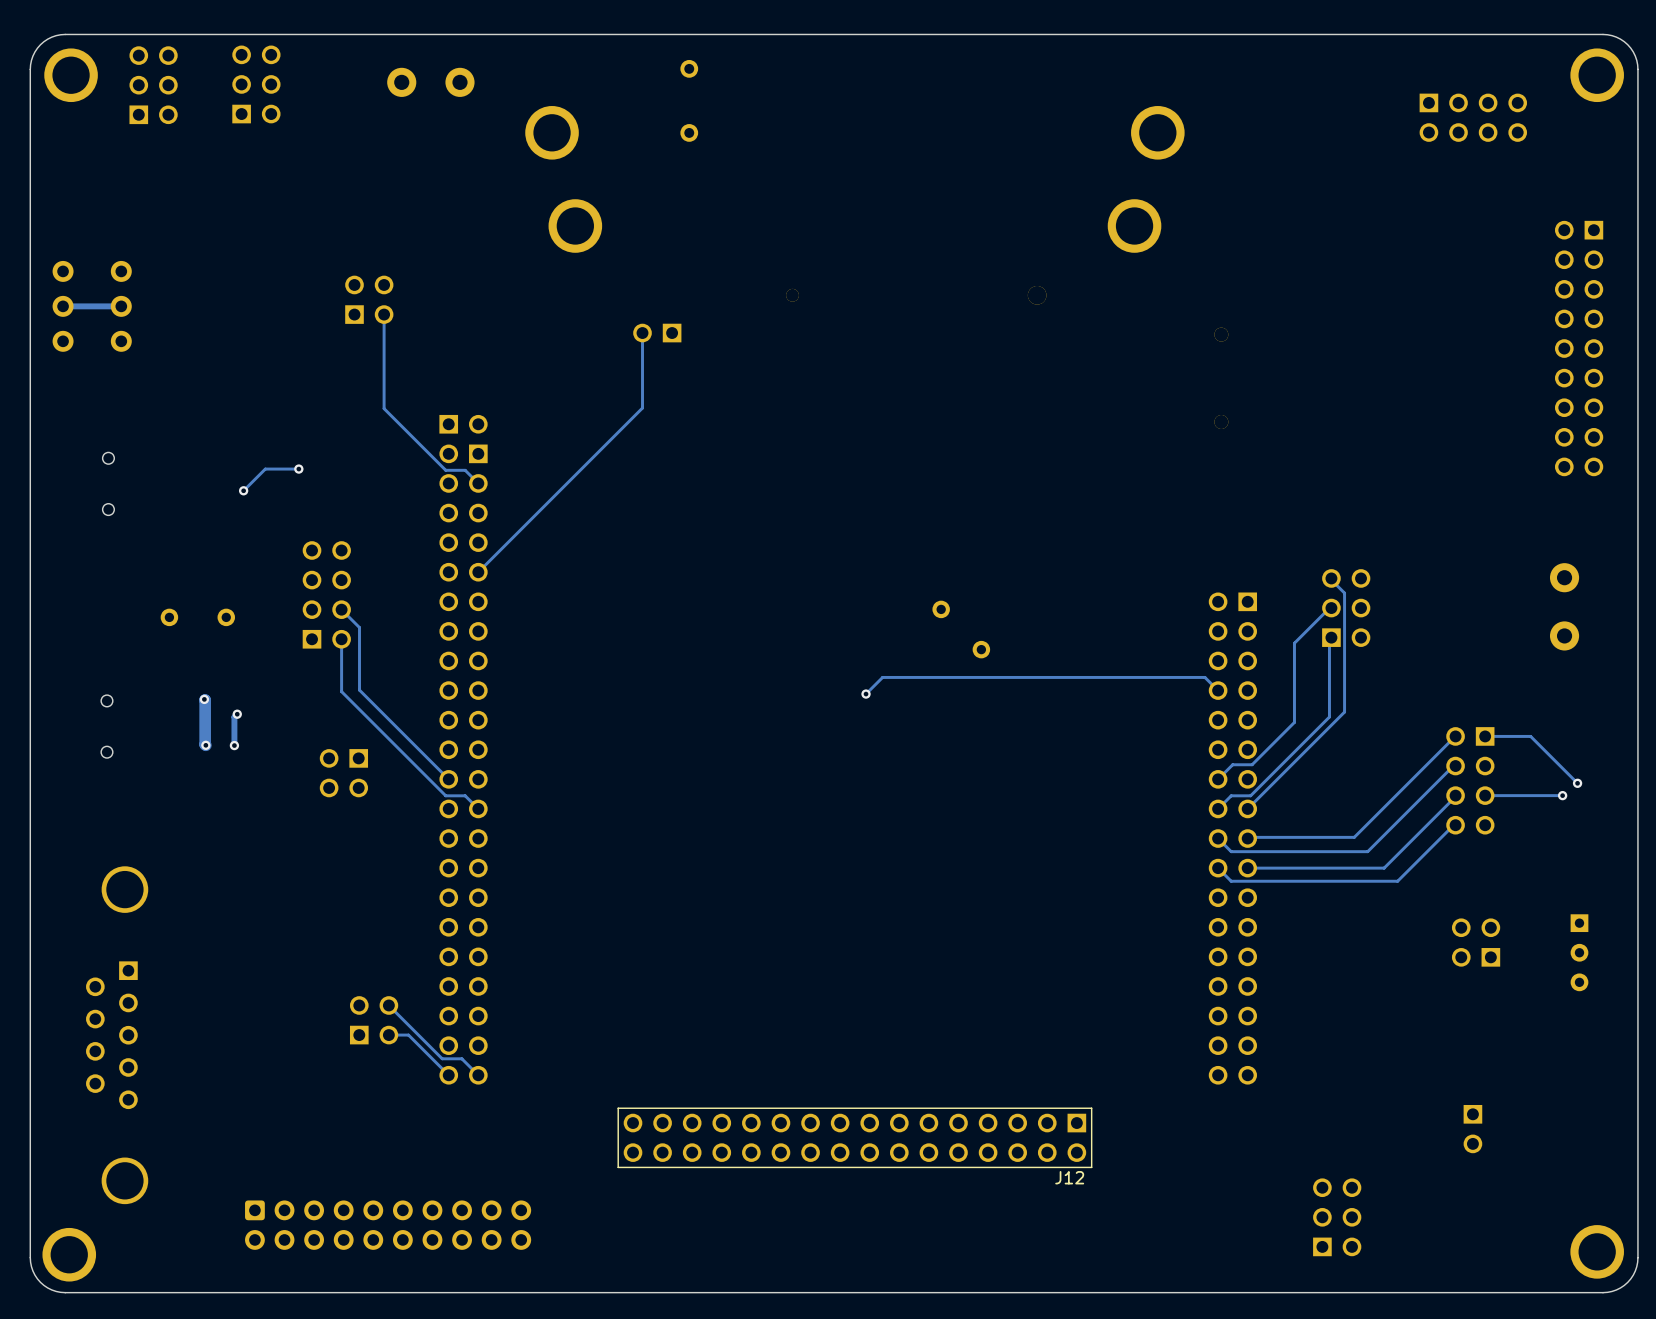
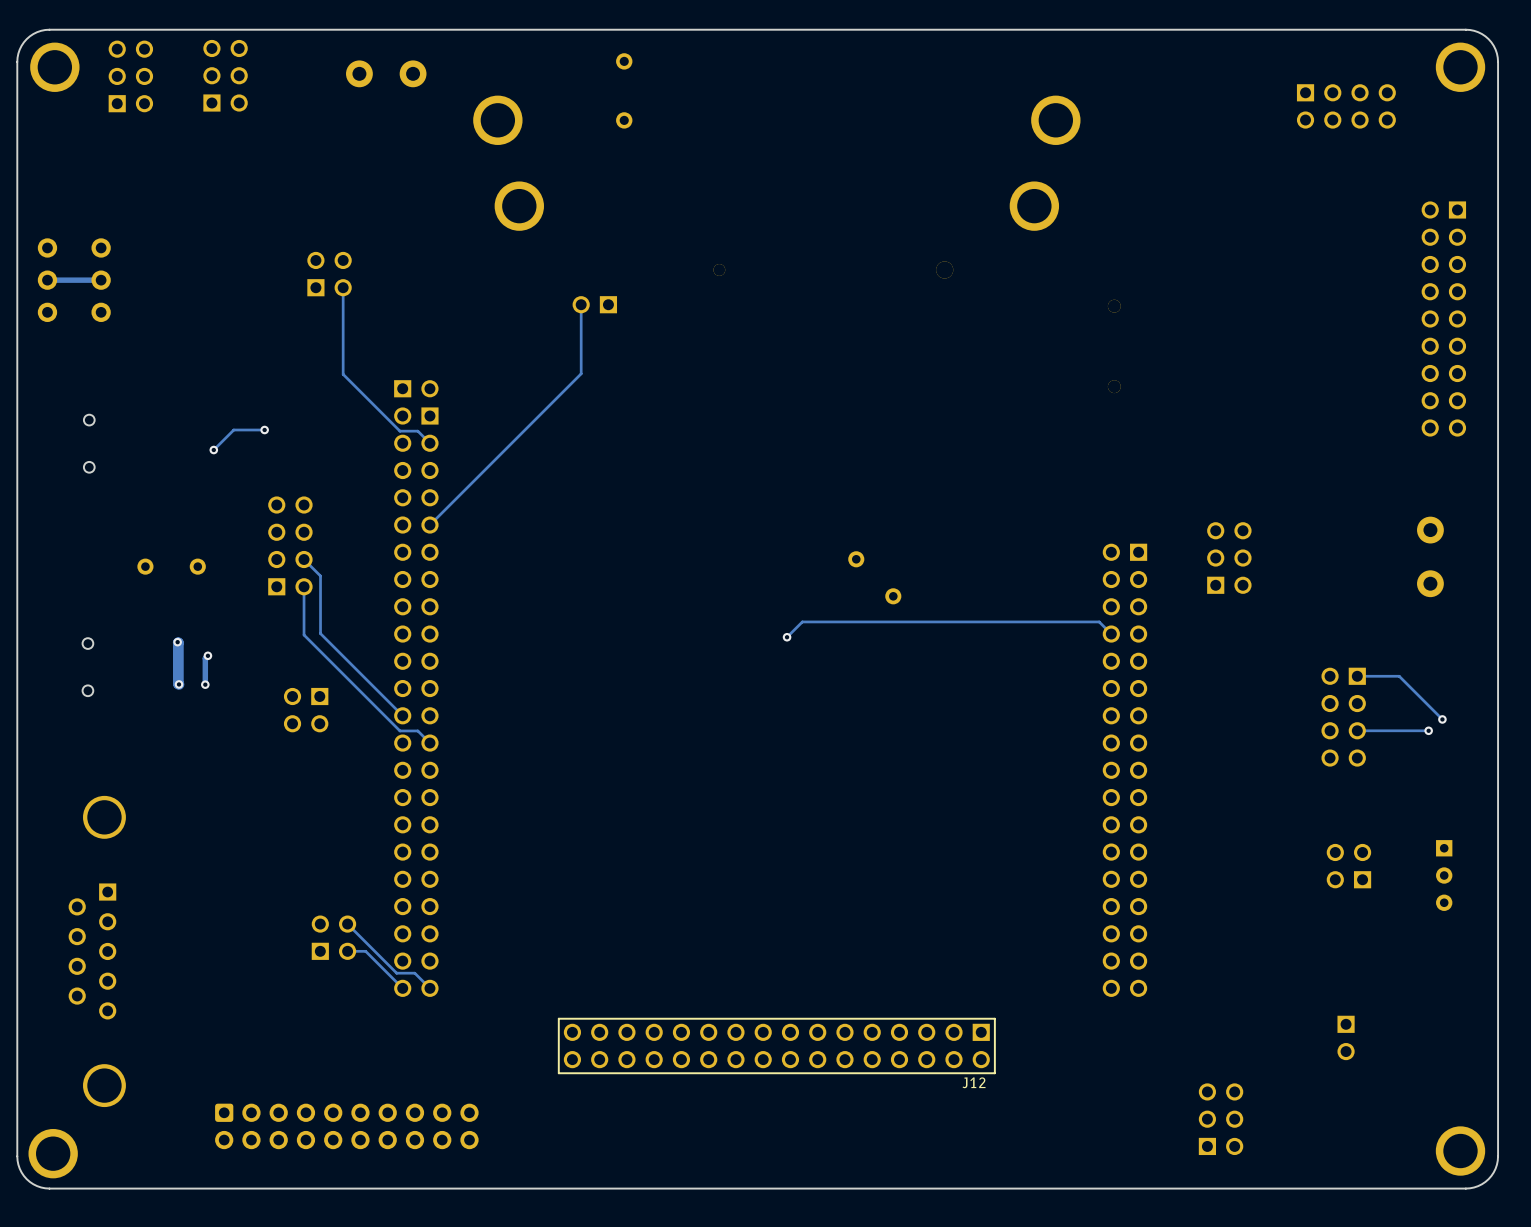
track: (1331, 578) (1344, 593) (1344, 712) (1247, 808) -> none
track: (1331, 608) (1331, 606) (1294, 643) (1294, 722) (1252, 764) (1232, 764) (1218, 779) -> none
track: (1331, 637) (1329, 637) (1329, 716) (1250, 795) (1231, 795) (1218, 808) -> none
track: (1455, 736) (1354, 837) (1247, 838) -> none
track: (1455, 766) (1453, 766) (1367, 851) (1231, 851) (1218, 838) -> none
track: (1455, 795) (1384, 868) (1247, 868) -> none
track: (1455, 825) (1397, 881) (1231, 881) (1218, 868) -> none

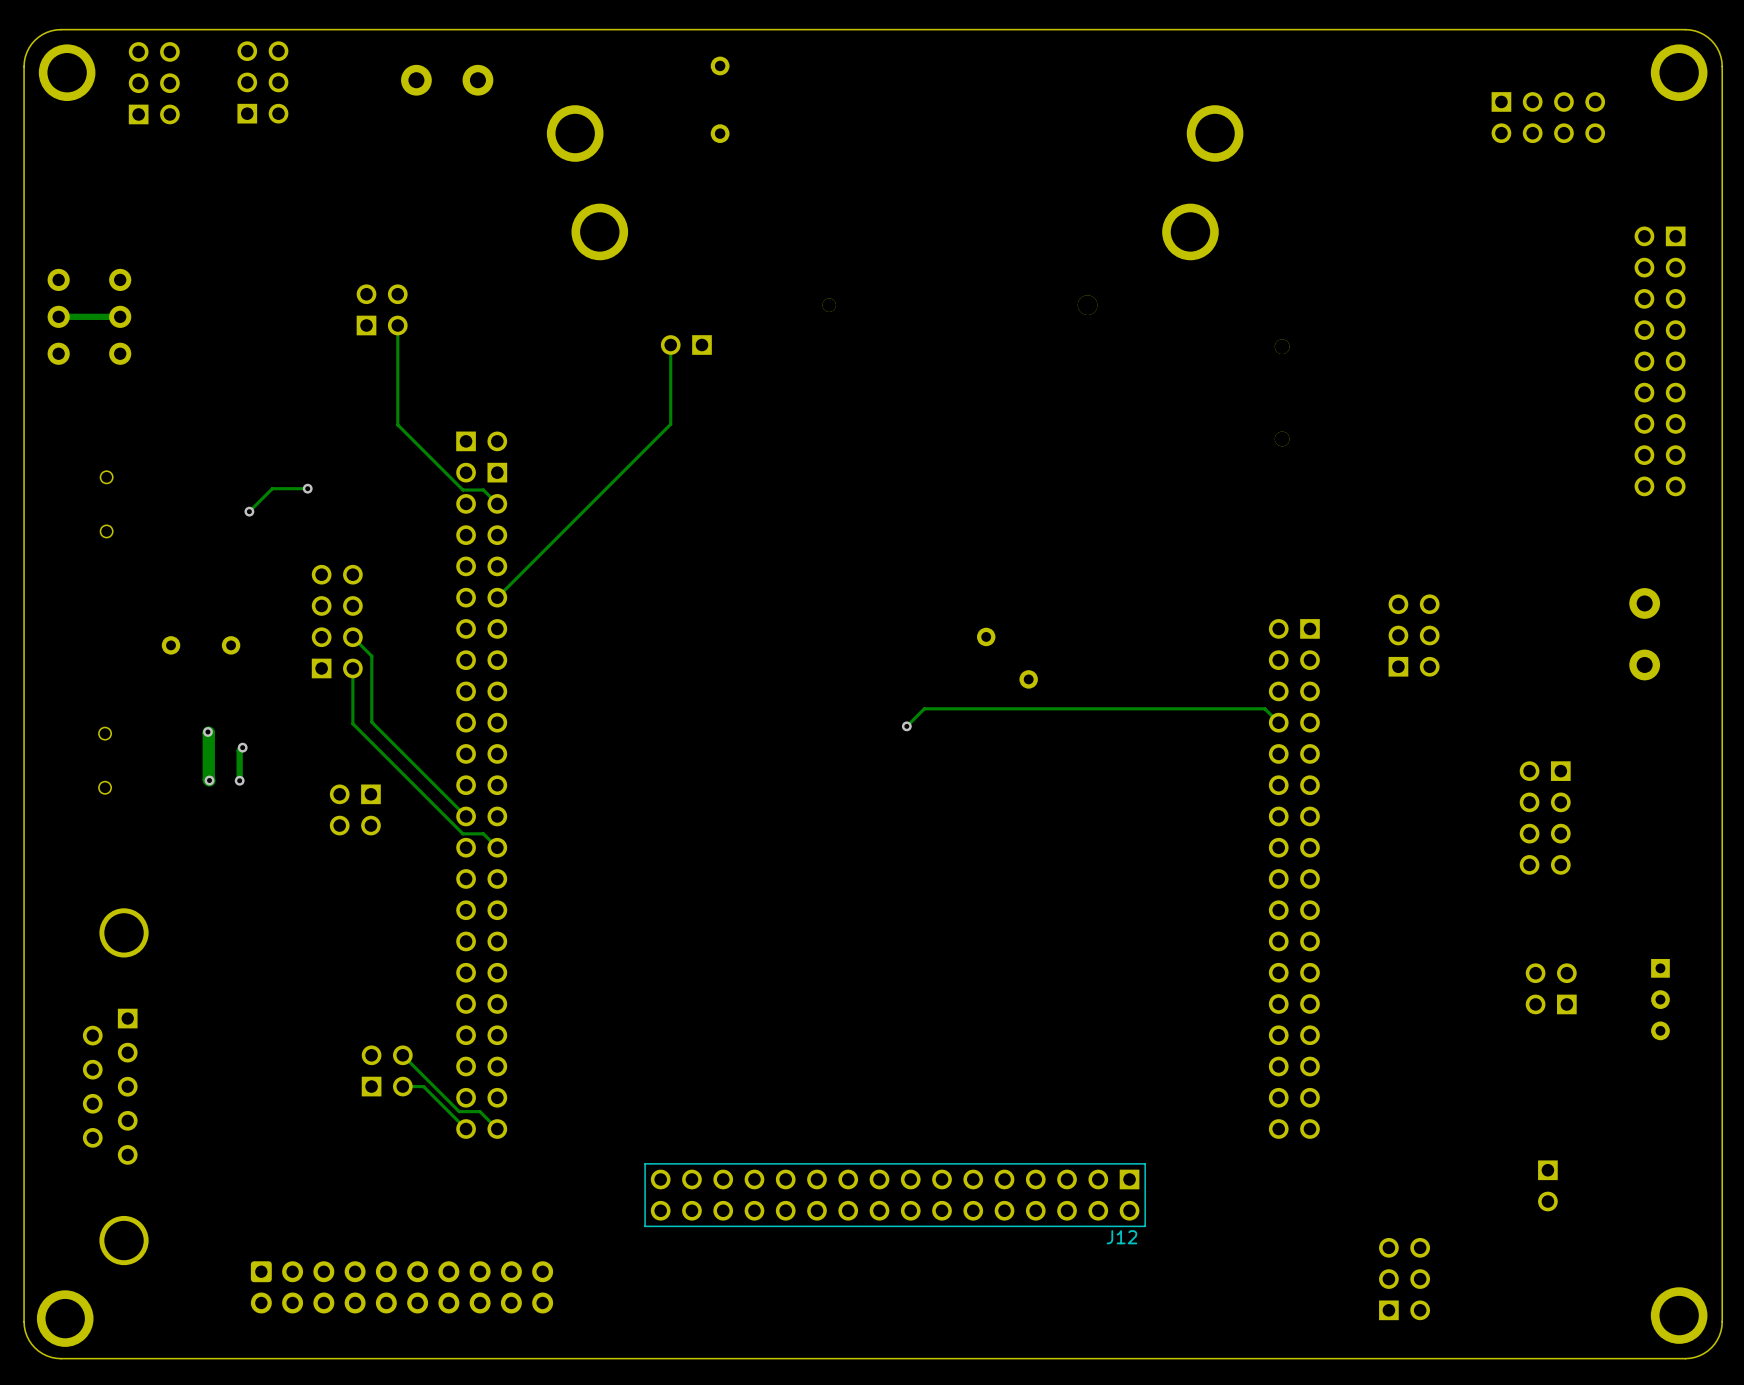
track: (1357, 676) (1399, 676) (1442, 719) -> none
via: (1442, 719) -> none
track: (1428, 730) (1357, 730) -> none
via: (1428, 730) -> none

